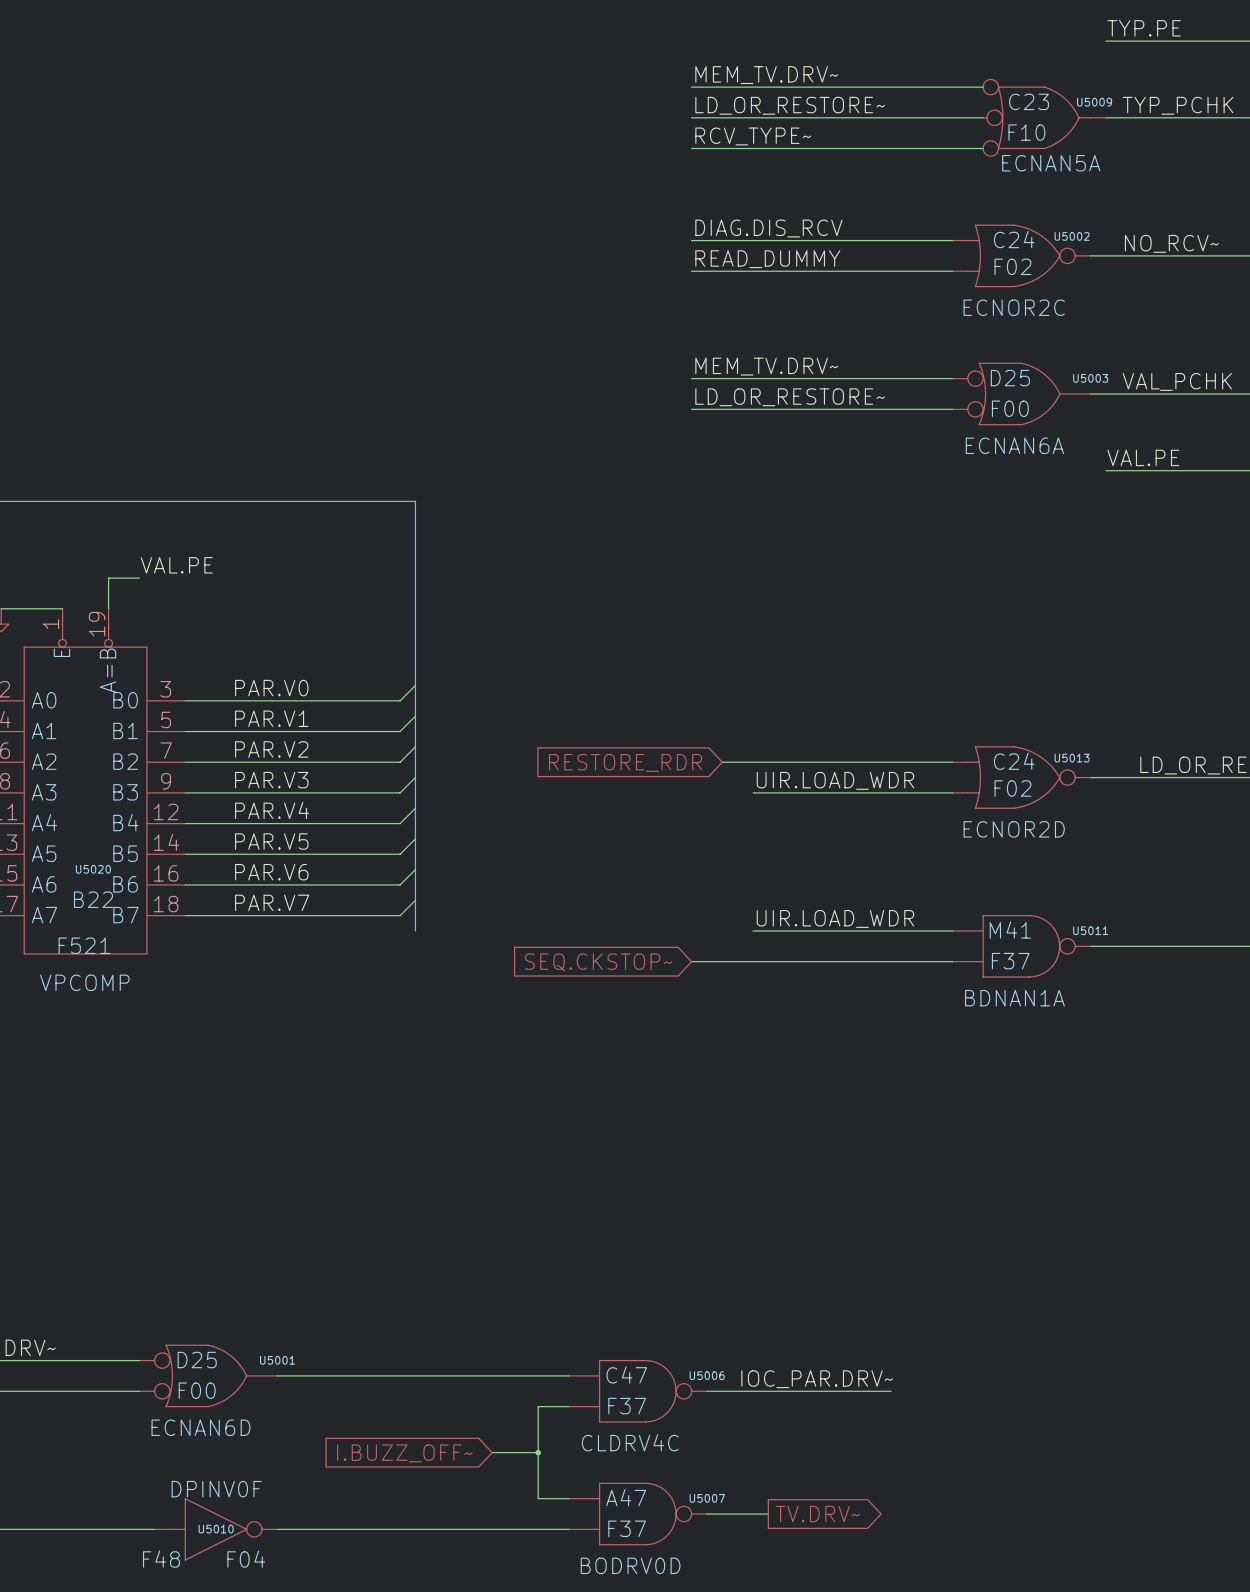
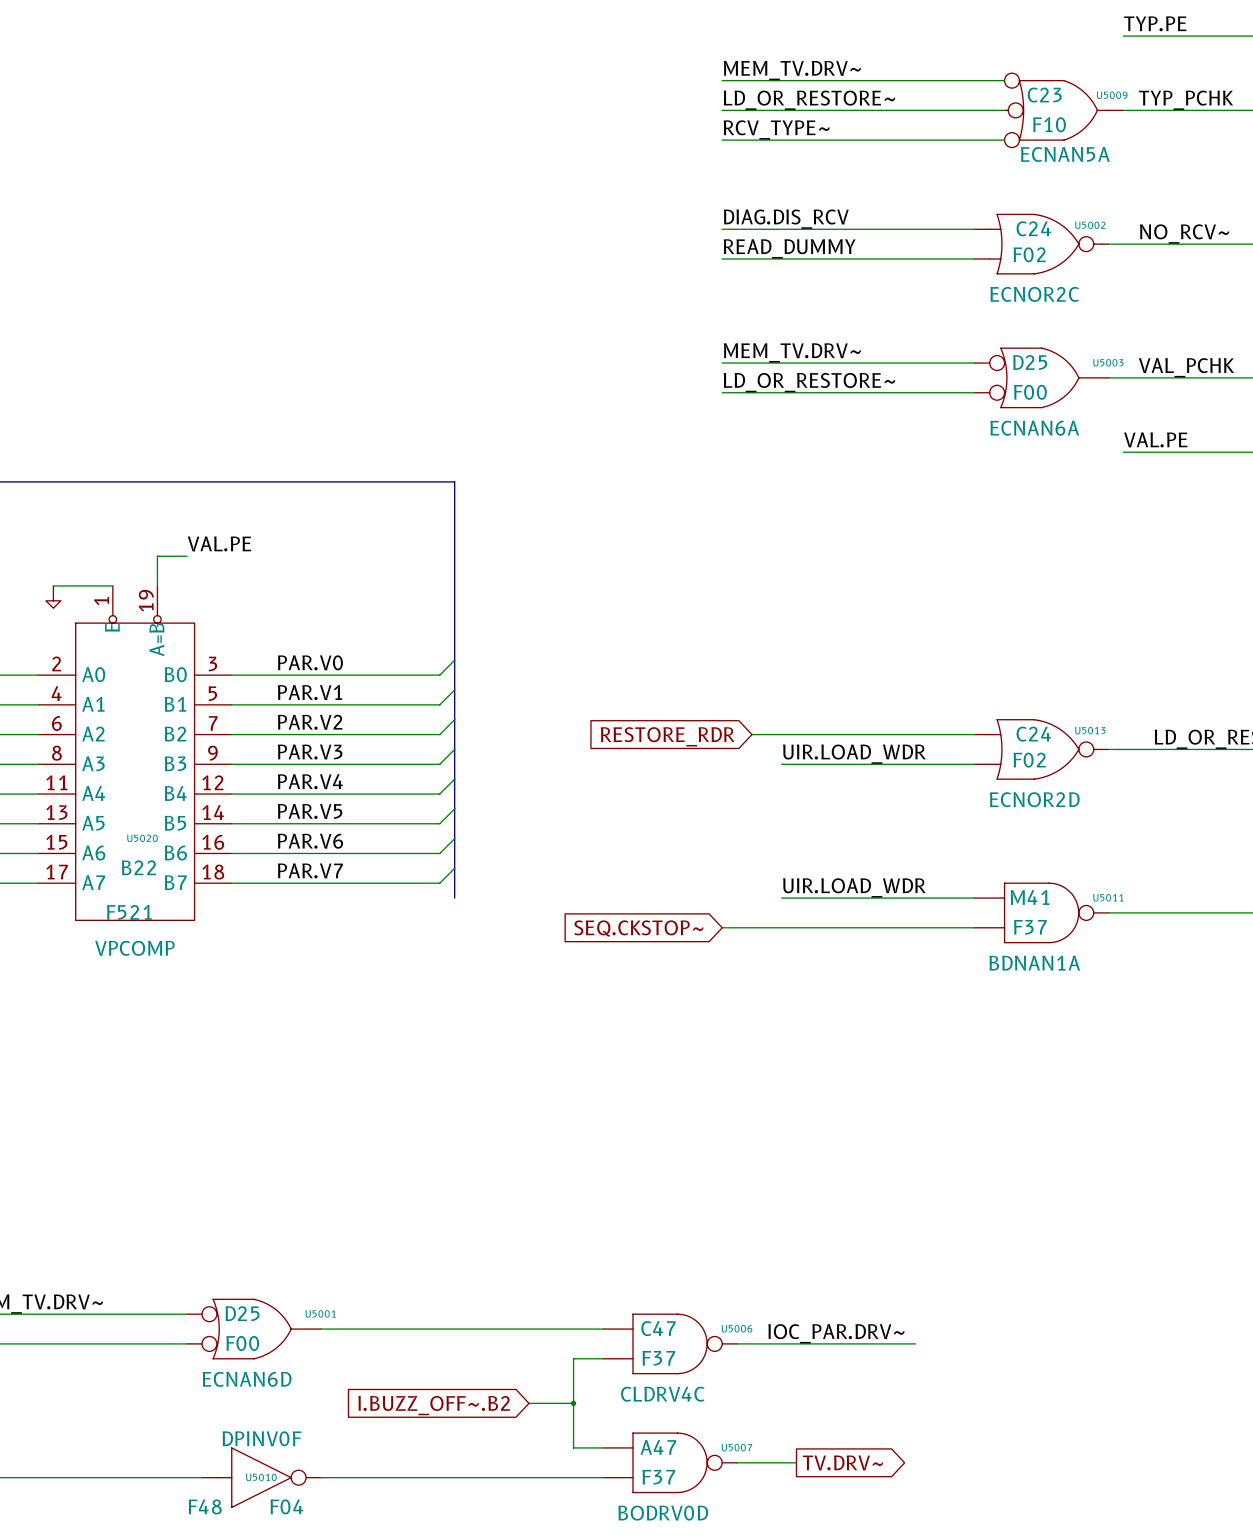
global label: I.BUZZ_OFF~ (404, 1453) -> I.BUZZ_OFF~.B2 (434, 1405)

